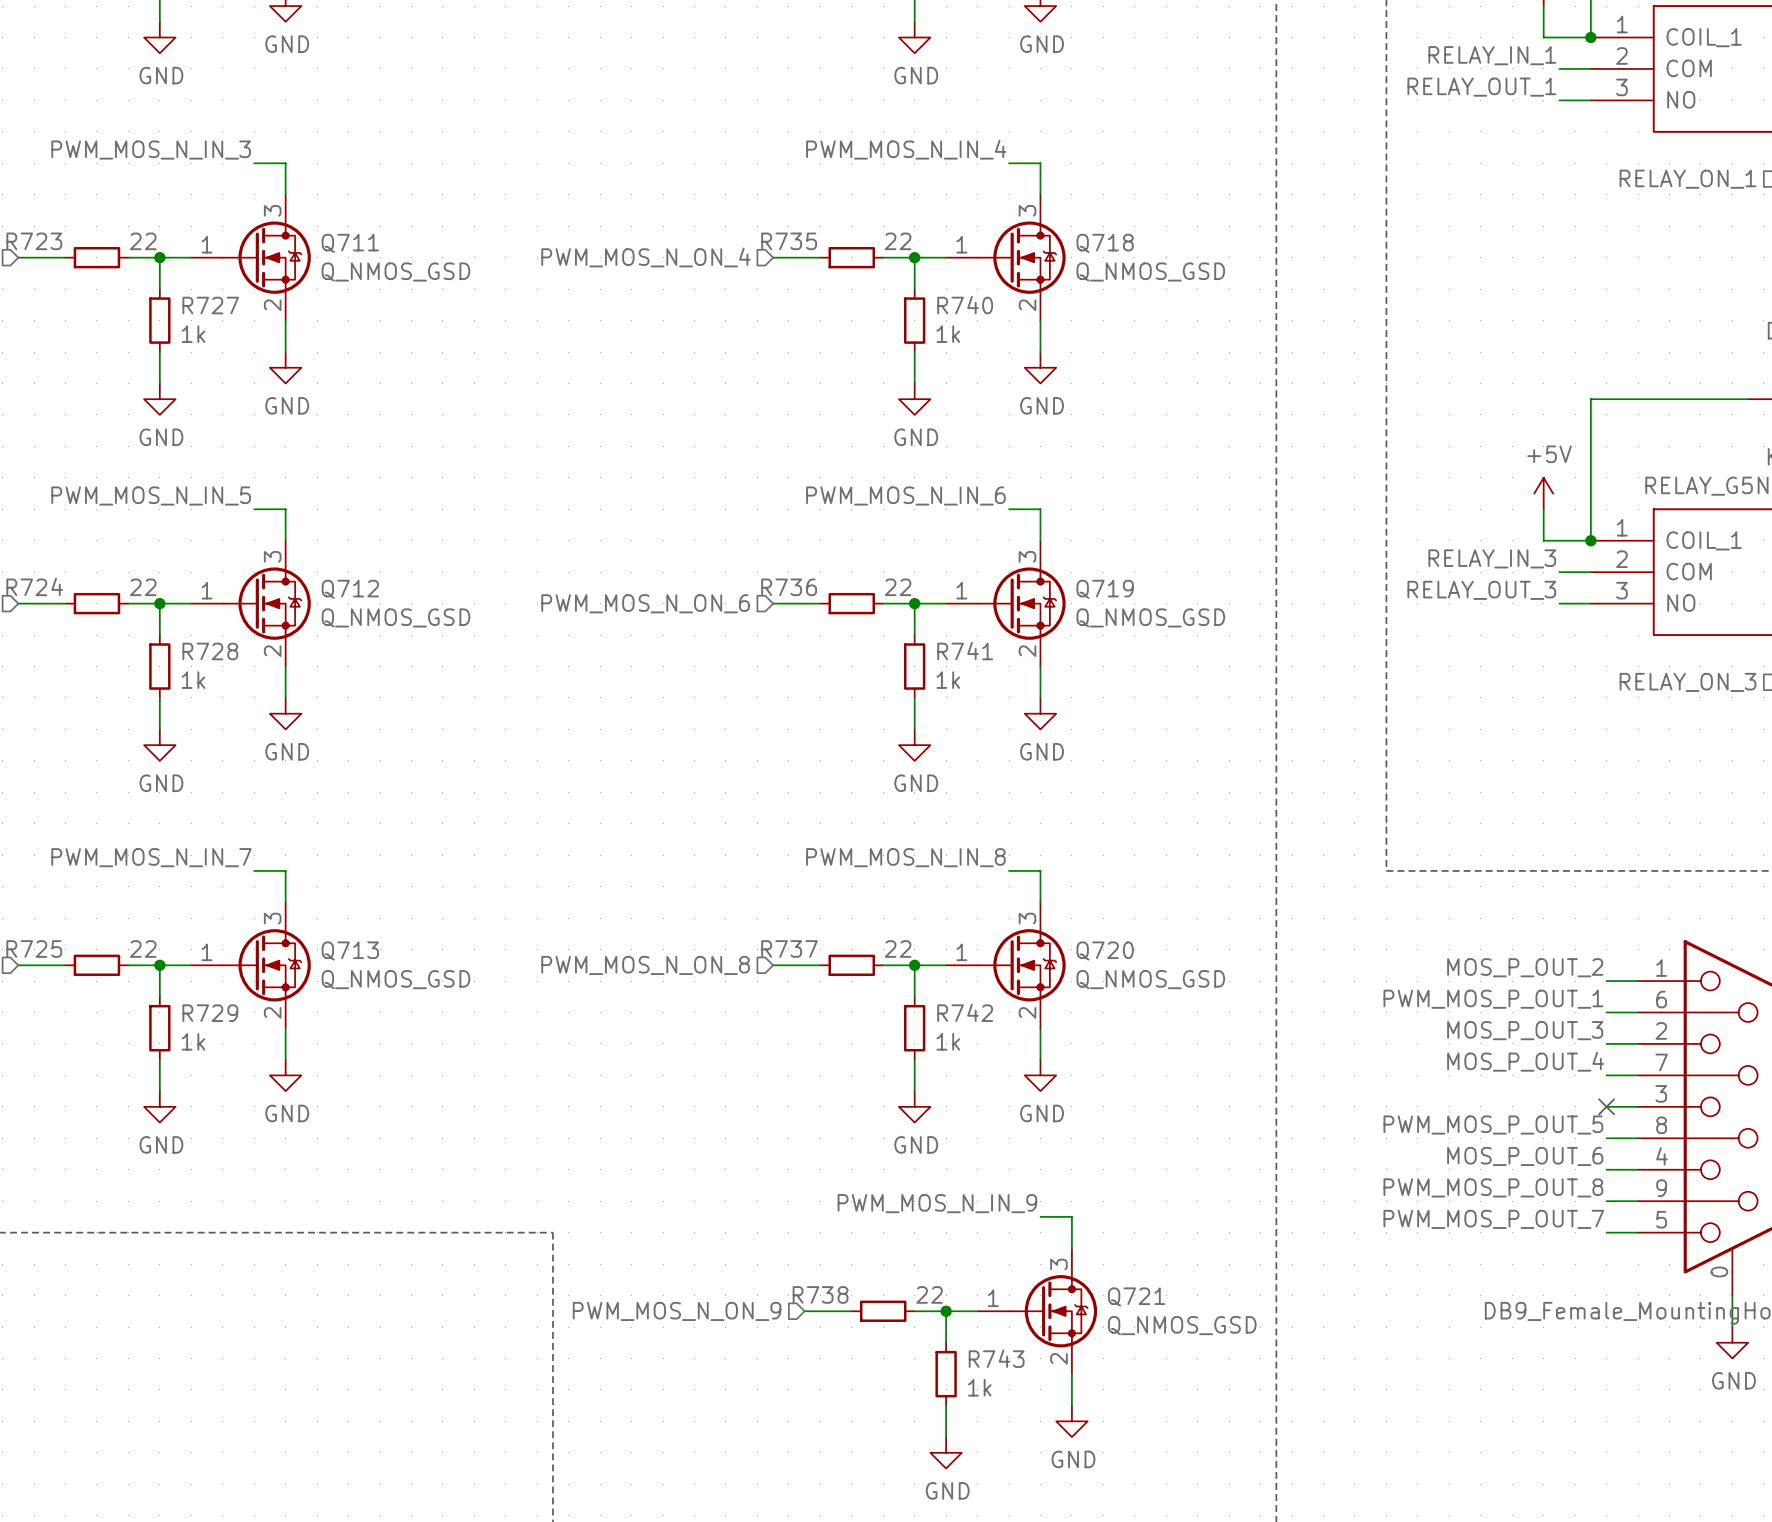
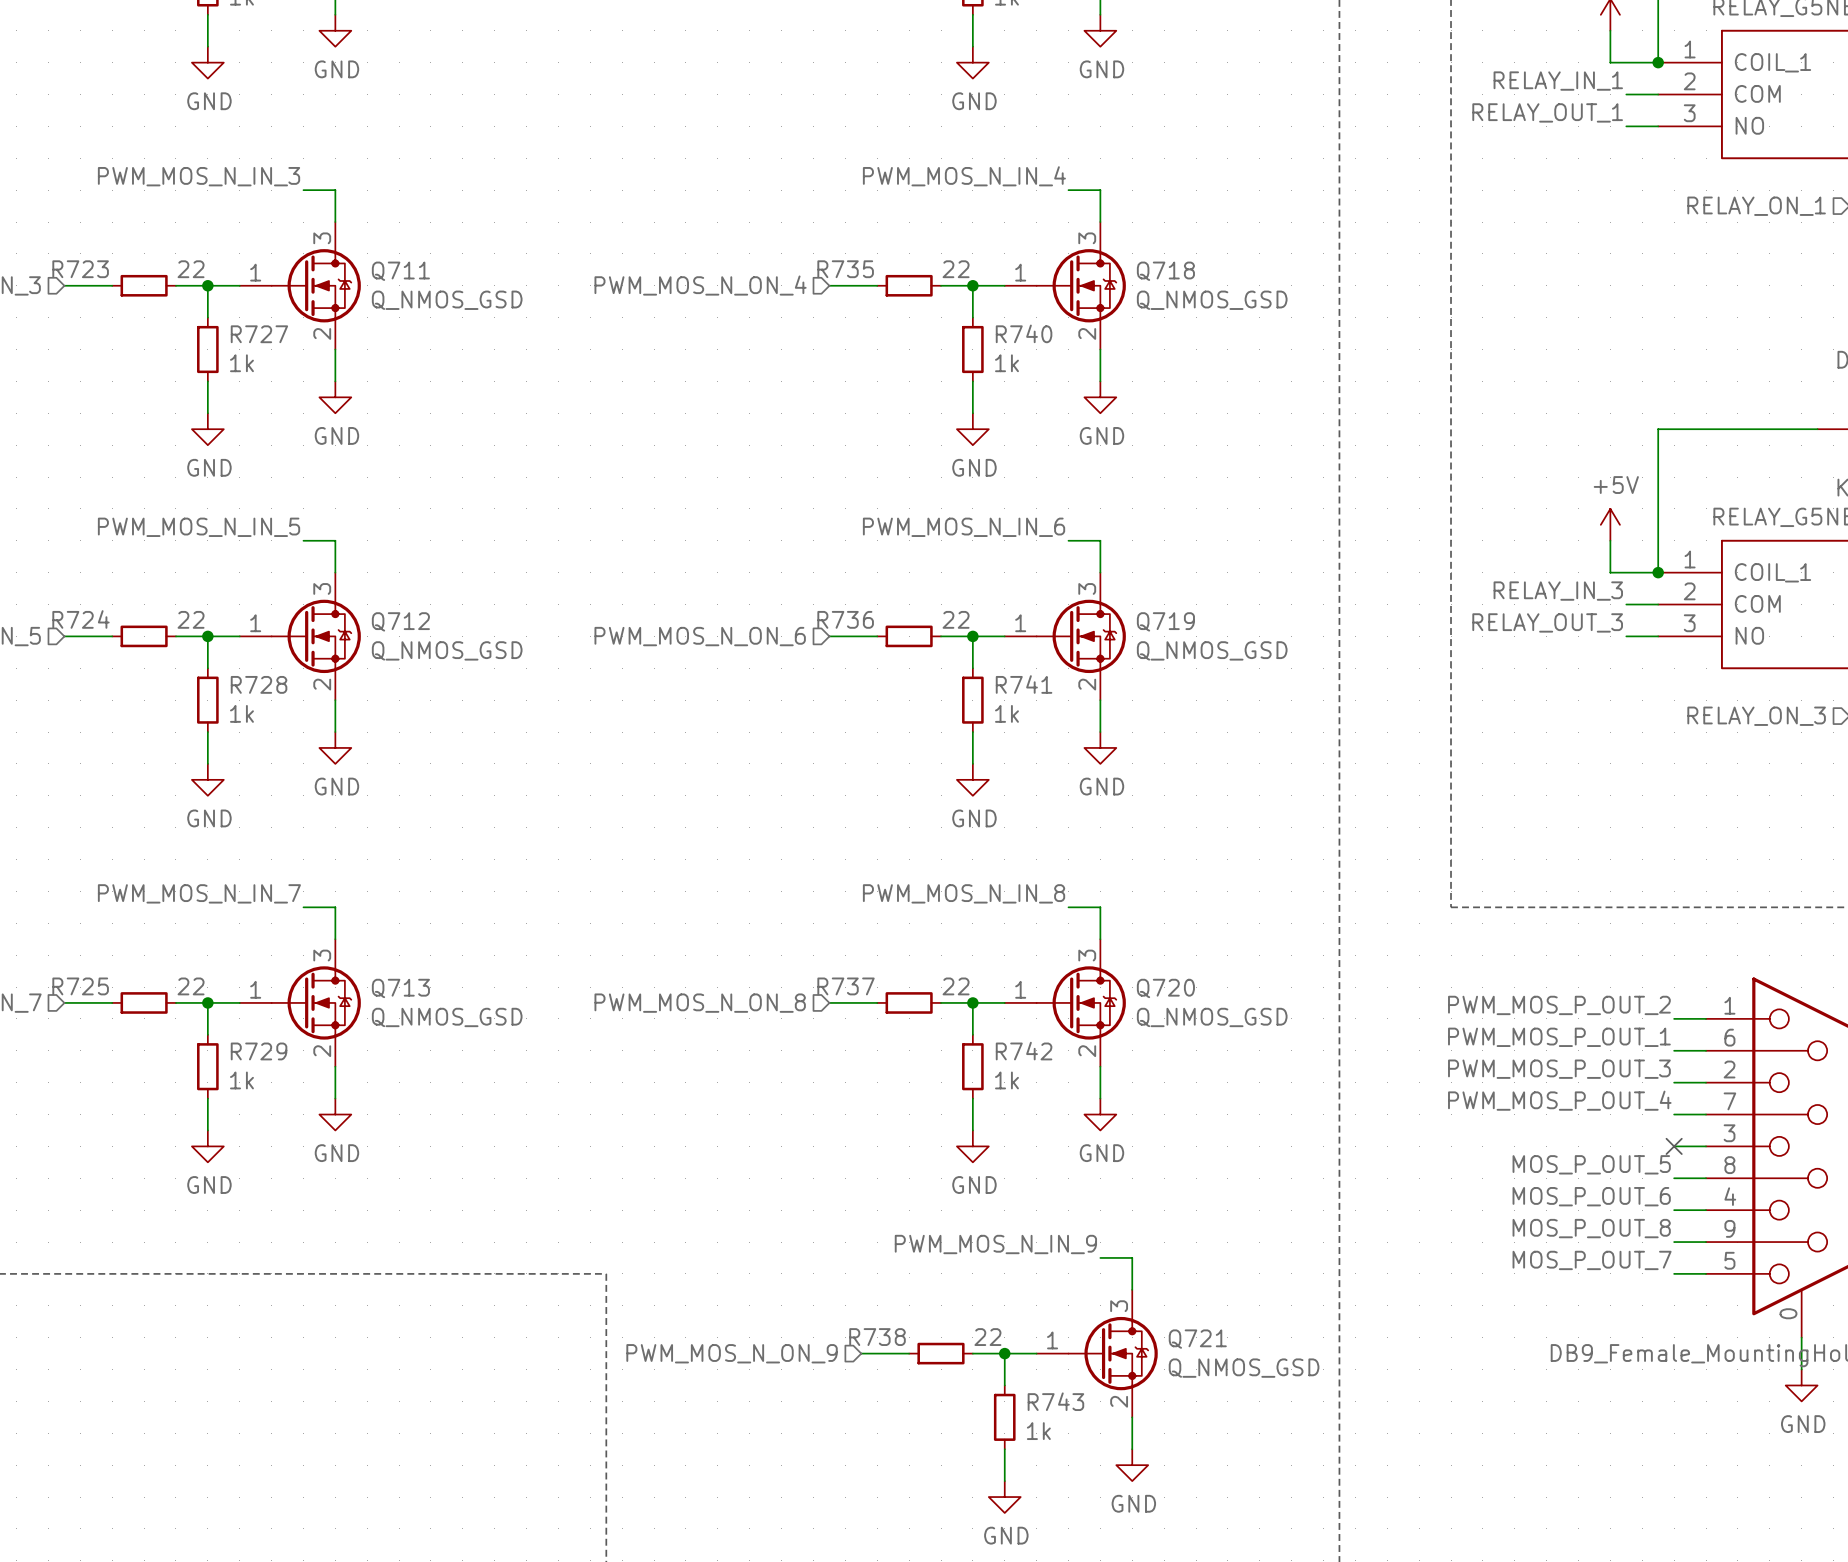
label: MOS_P_OUT_2 (1525, 967) -> PWM_MOS_P_OUT_2 (1559, 1005)
label: MOS_P_OUT_3 (1525, 1030) -> PWM_MOS_P_OUT_3 (1559, 1069)
label: MOS_P_OUT_4 (1525, 1061) -> PWM_MOS_P_OUT_4 (1559, 1100)
label: PWM_MOS_P_OUT_5 (1493, 1125) -> MOS_P_OUT_5 (1591, 1164)
label: PWM_MOS_P_OUT_8 (1493, 1187) -> MOS_P_OUT_8 (1591, 1228)
label: PWM_MOS_P_OUT_7 (1493, 1219) -> MOS_P_OUT_7 (1592, 1260)

